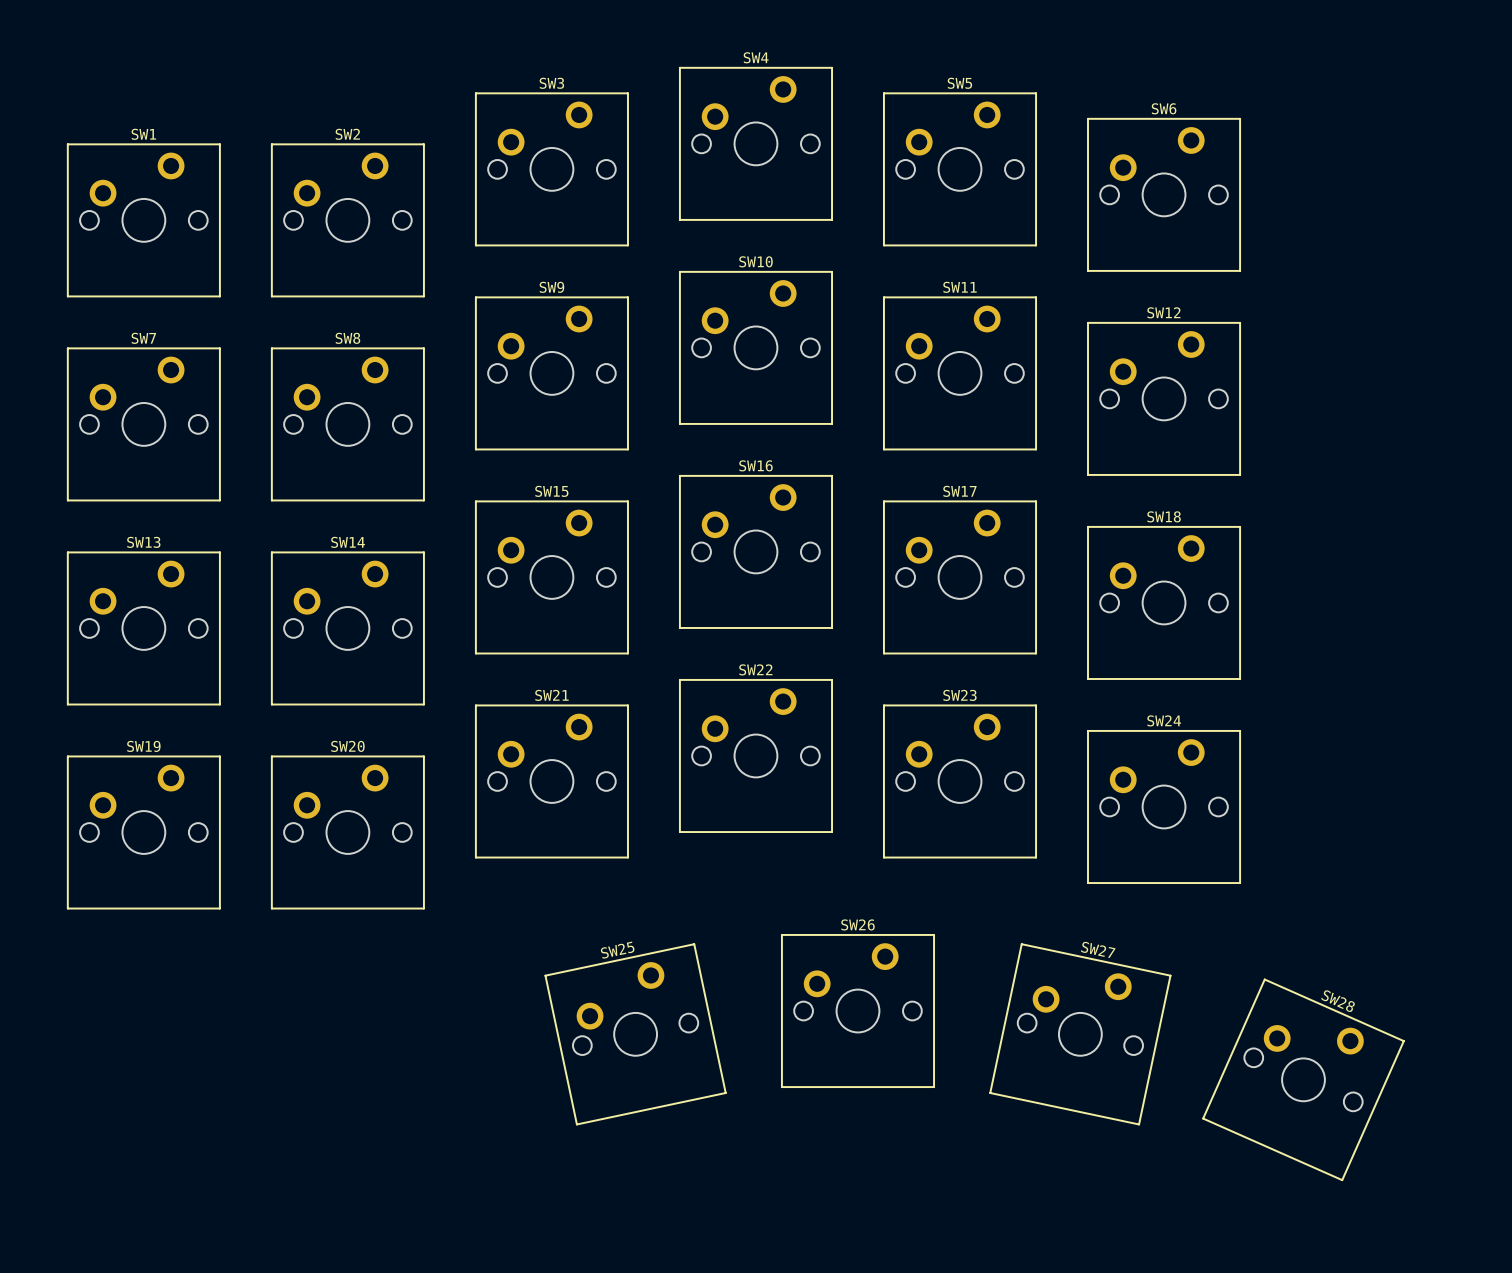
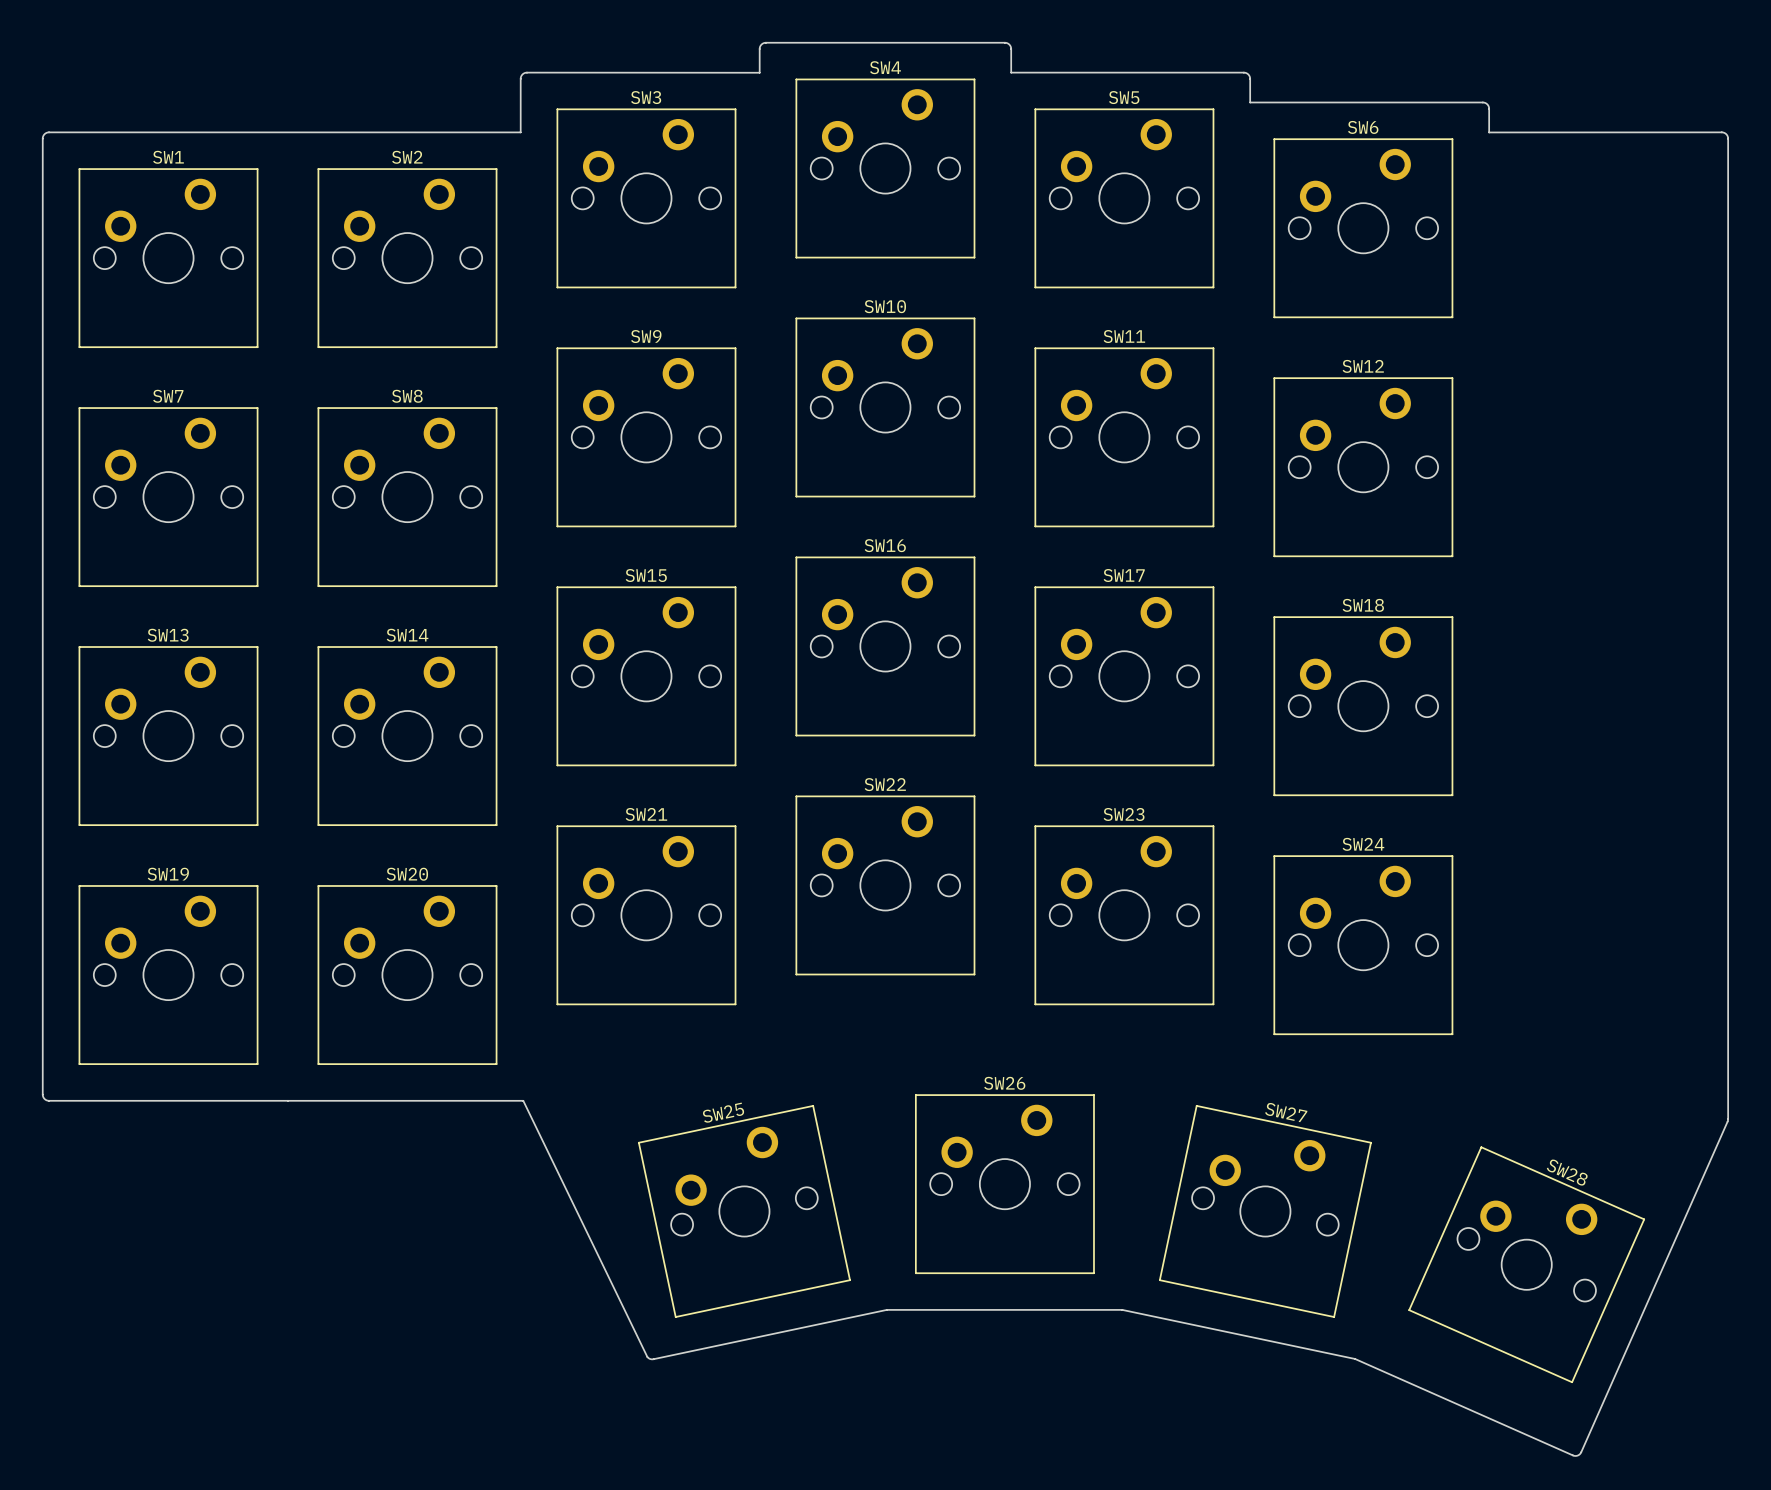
board edge: none -> (765, 42) (1005, 42) (1011, 48) (1011, 72) (1244, 72) (1250, 78) (1250, 102) (1483, 102) (1489, 107) (1489, 132) (1721, 132) (1727, 135) (1728, 1119) (1578, 1455) (1572, 1455) (1355, 1358) (1122, 1309) (886, 1309) (650, 1359) (647, 1357) (523, 1100) (49, 1100) (43, 1097) (44, 134) (49, 132) (520, 132) (520, 78) (524, 73) (759, 72) (759, 47) (765, 42)

